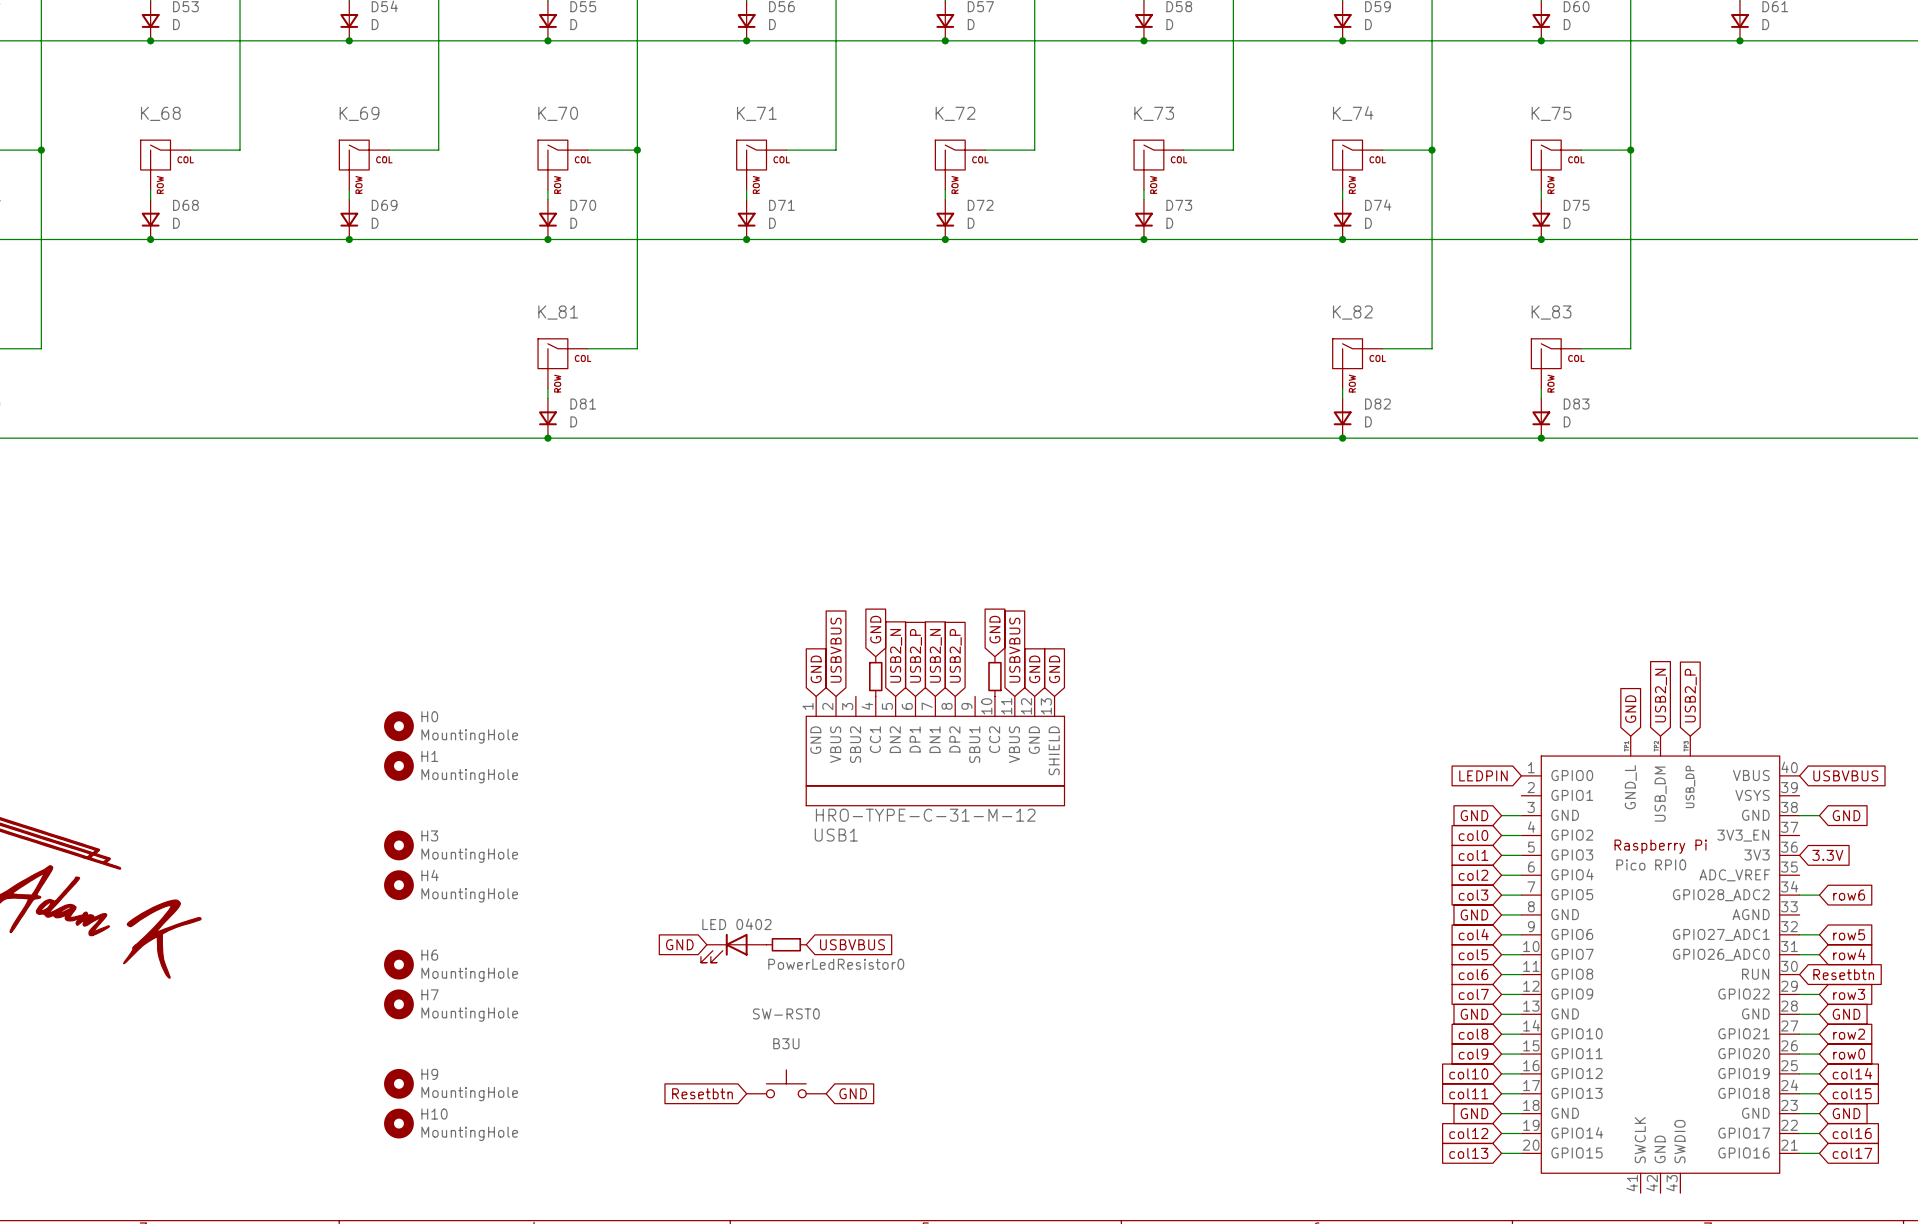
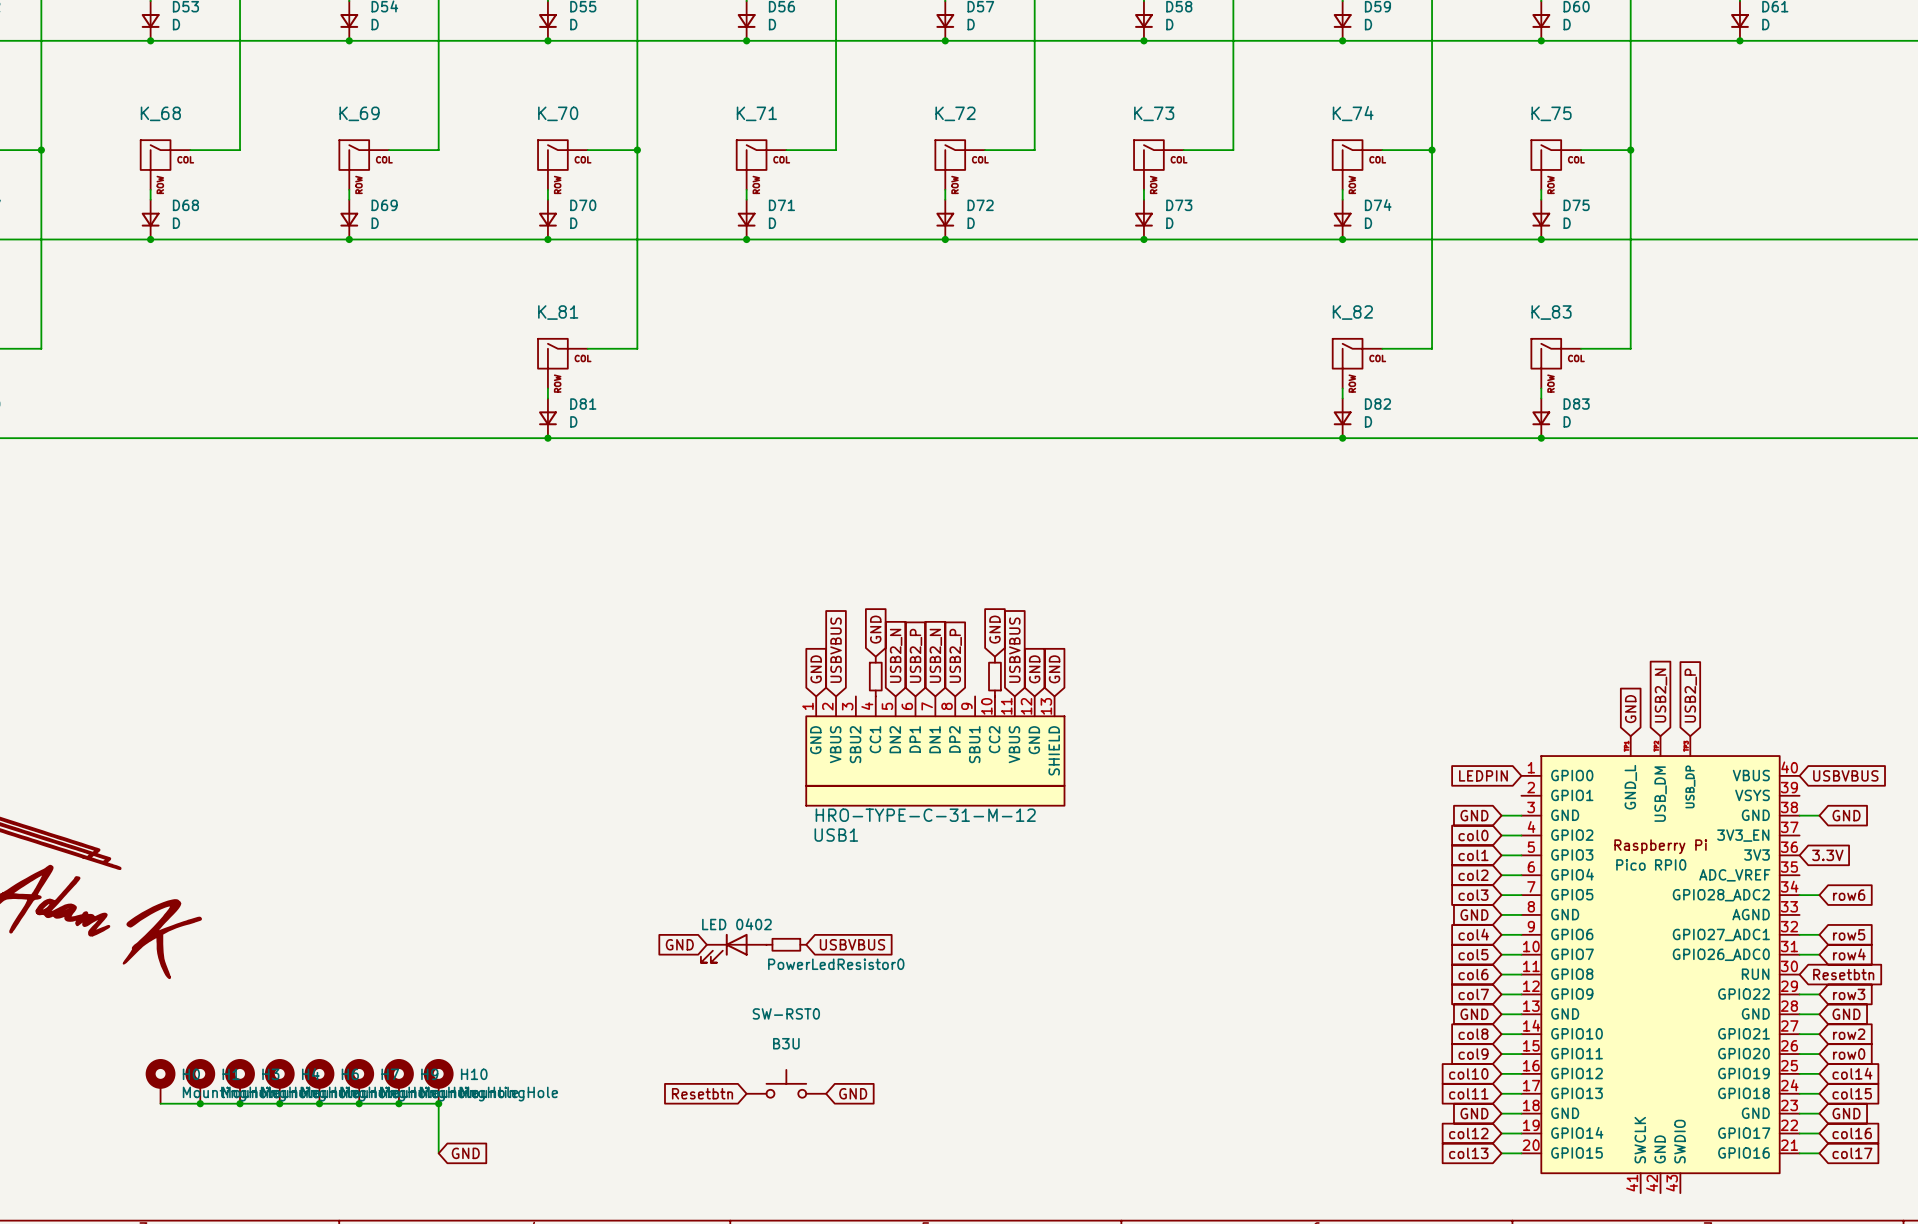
H0 symbol: [384, 711, 414, 742] -> [145, 1059, 176, 1104]
H1 symbol: [384, 751, 414, 781] -> [185, 1059, 216, 1104]
H3 symbol: [384, 830, 414, 861] -> [225, 1059, 255, 1104]
H4 symbol: [384, 870, 414, 901] -> [264, 1059, 295, 1104]
H6 symbol: [384, 949, 414, 980] -> [304, 1059, 335, 1104]
H7 symbol: [384, 989, 414, 1020] -> [344, 1059, 375, 1104]
H9 symbol: [384, 1068, 414, 1099] -> [384, 1059, 414, 1104]
wire: none -> (160, 1103) (438, 1103) (438, 1153)
junction: none -> (200, 1103)
junction: none -> (240, 1103)
junction: none -> (279, 1103)
junction: none -> (319, 1103)
junction: none -> (359, 1103)
junction: none -> (398, 1103)
junction: none -> (438, 1103)
H10 symbol: [384, 1108, 414, 1139] -> [423, 1059, 454, 1104]
global label: none -> GND (465, 1153)

